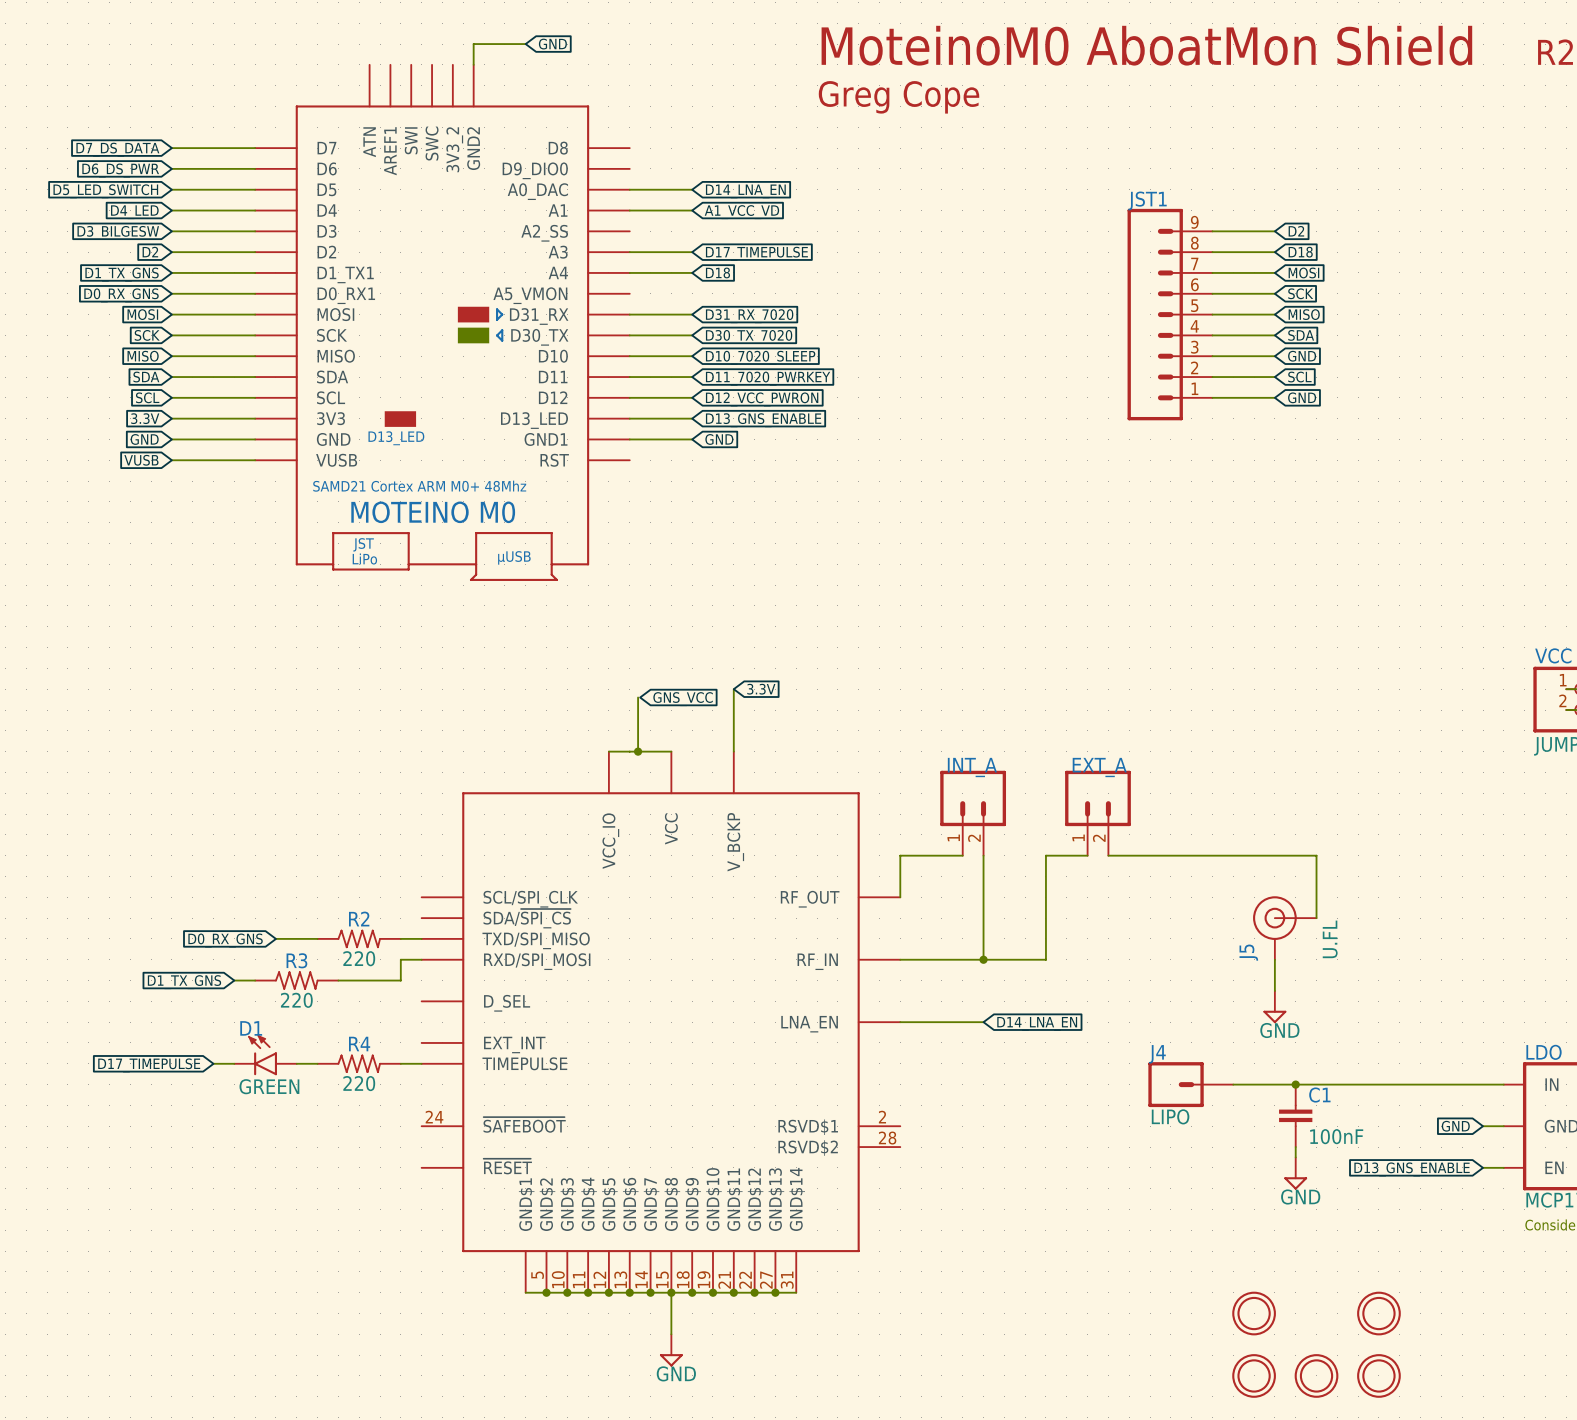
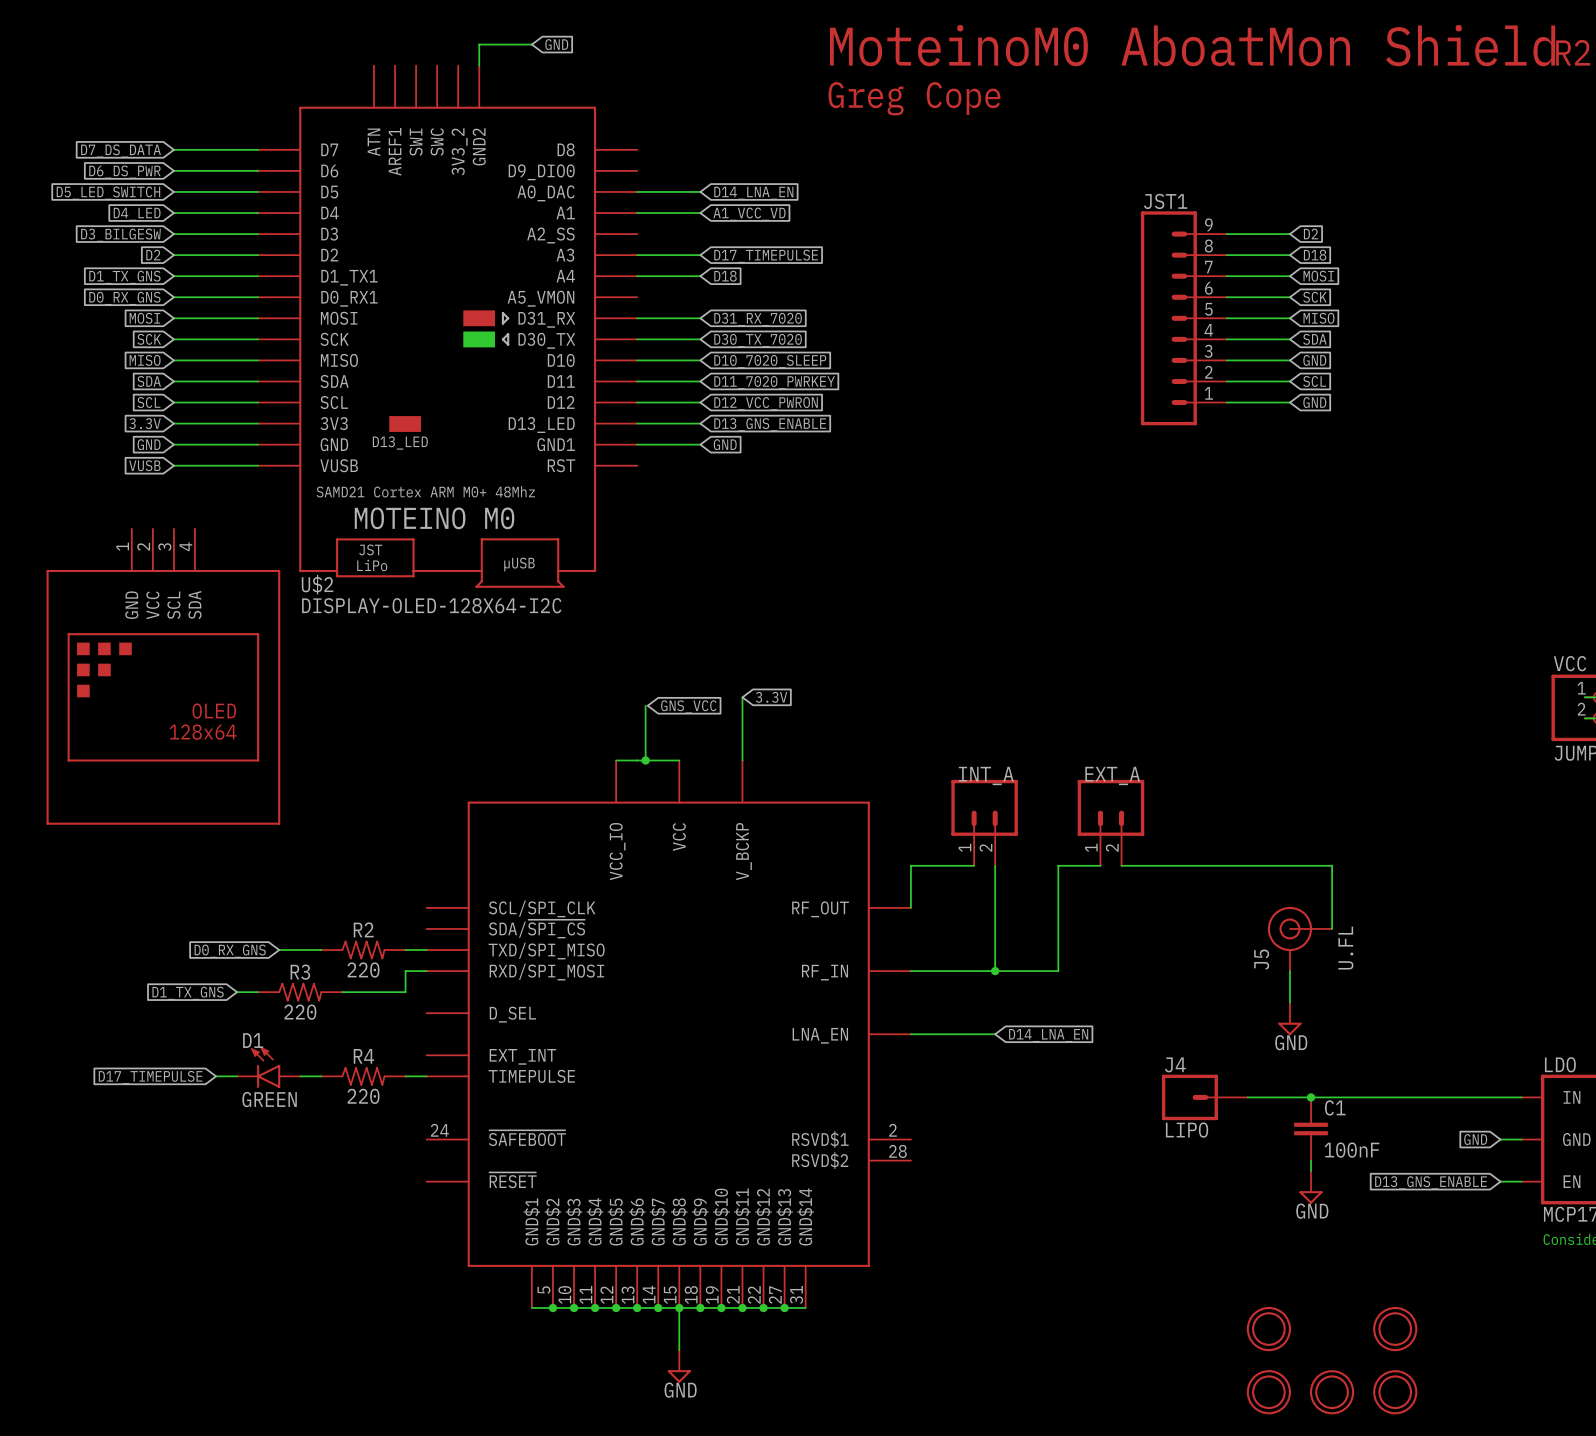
U$2: none -> DISPLAY-OLED-128X64-I2C (163, 676)

